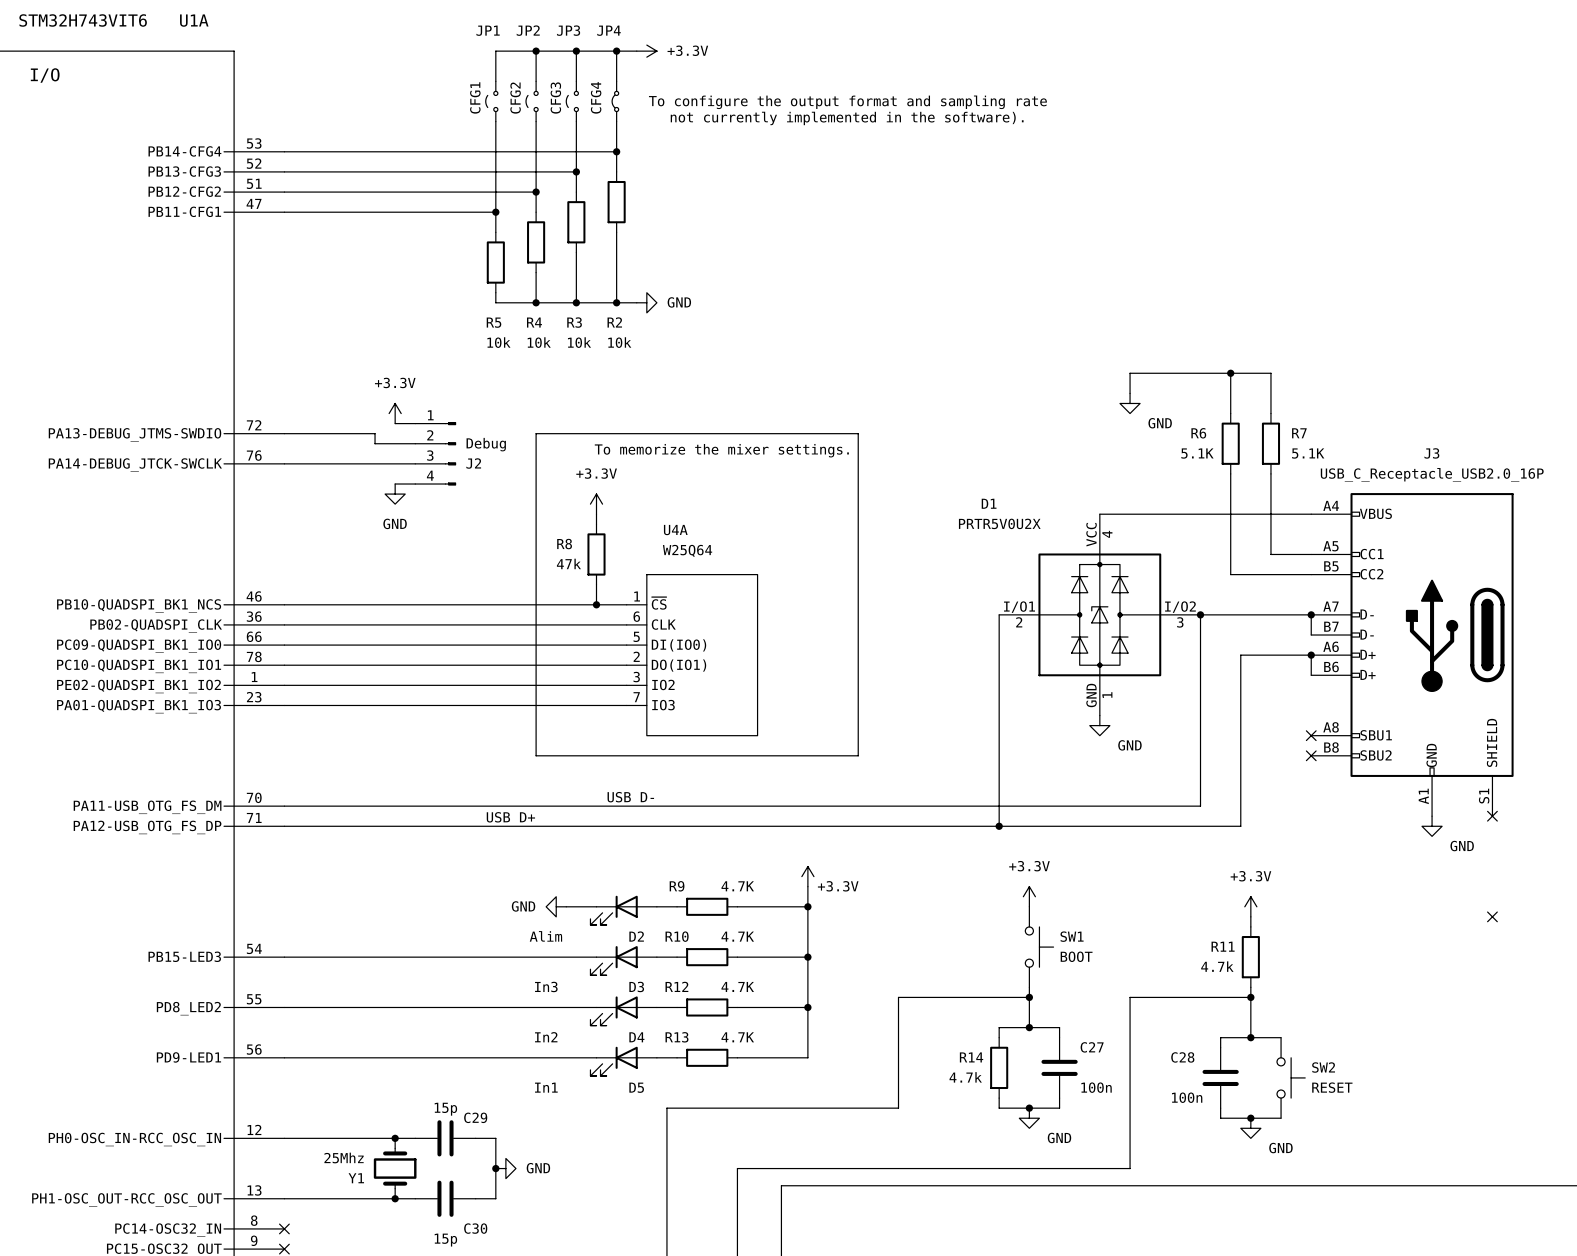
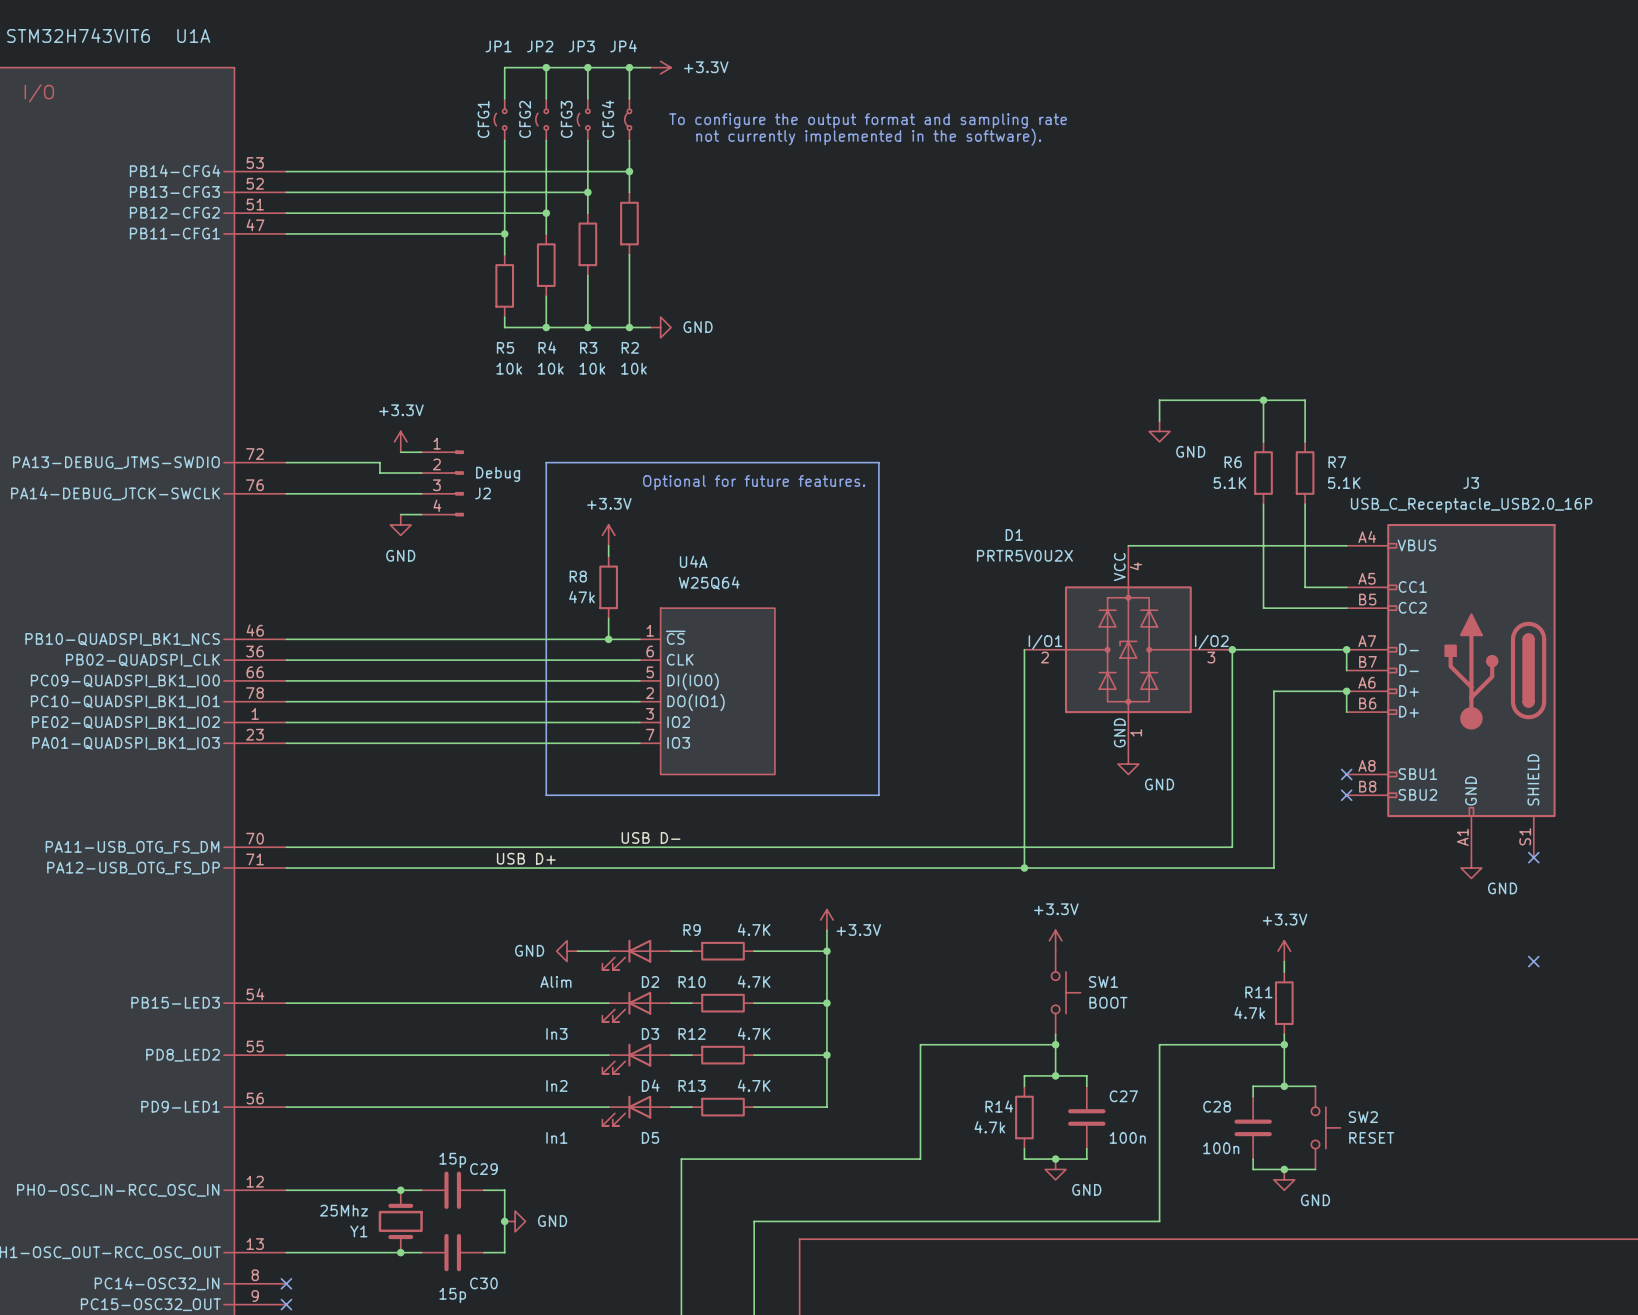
text: To memorize the mixer settings. (721, 450) -> none
text: none -> Optional for future features. (754, 482)

